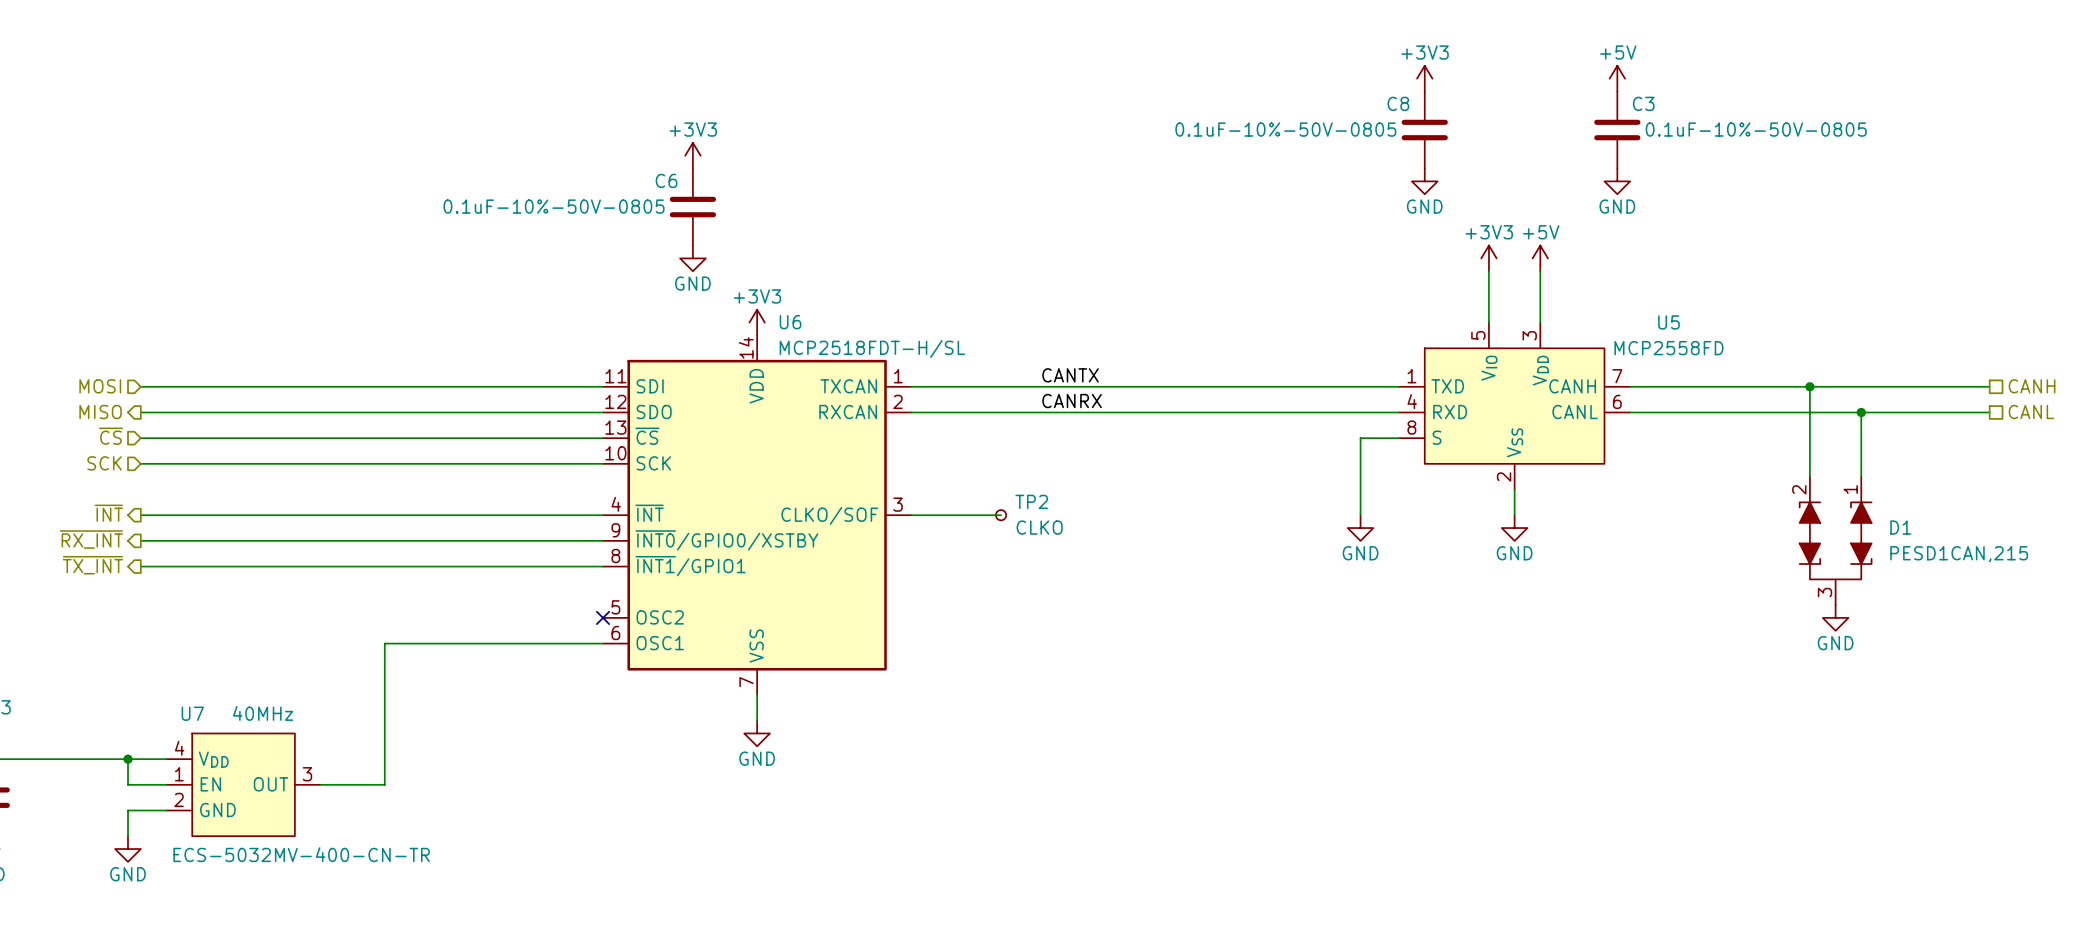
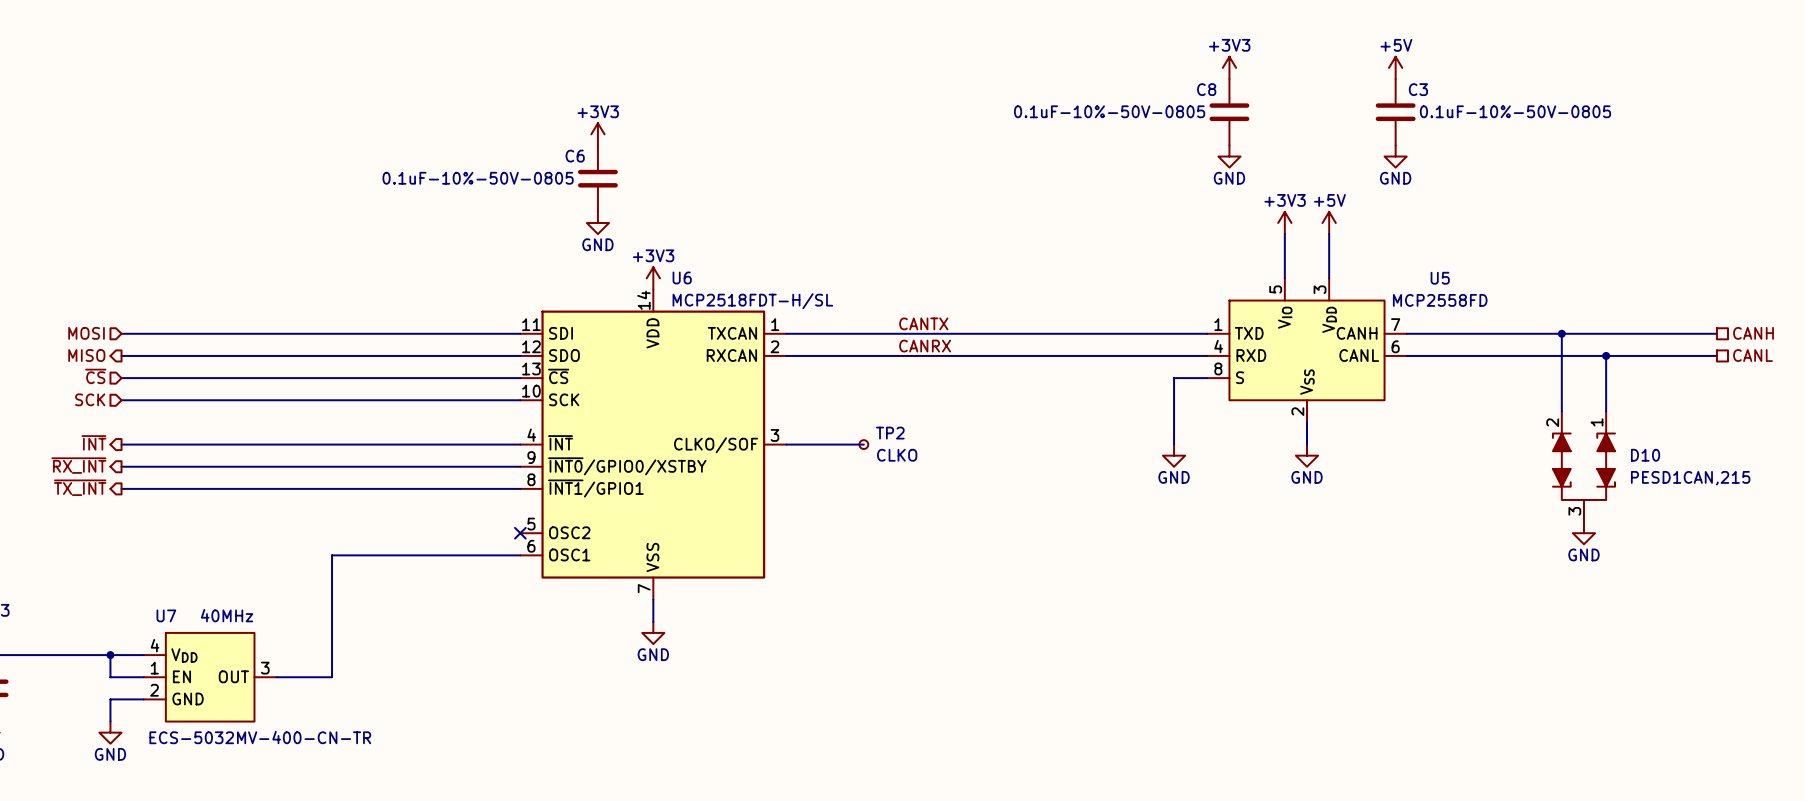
D1 name: D1 (1900, 527) -> D10 (1645, 455)

